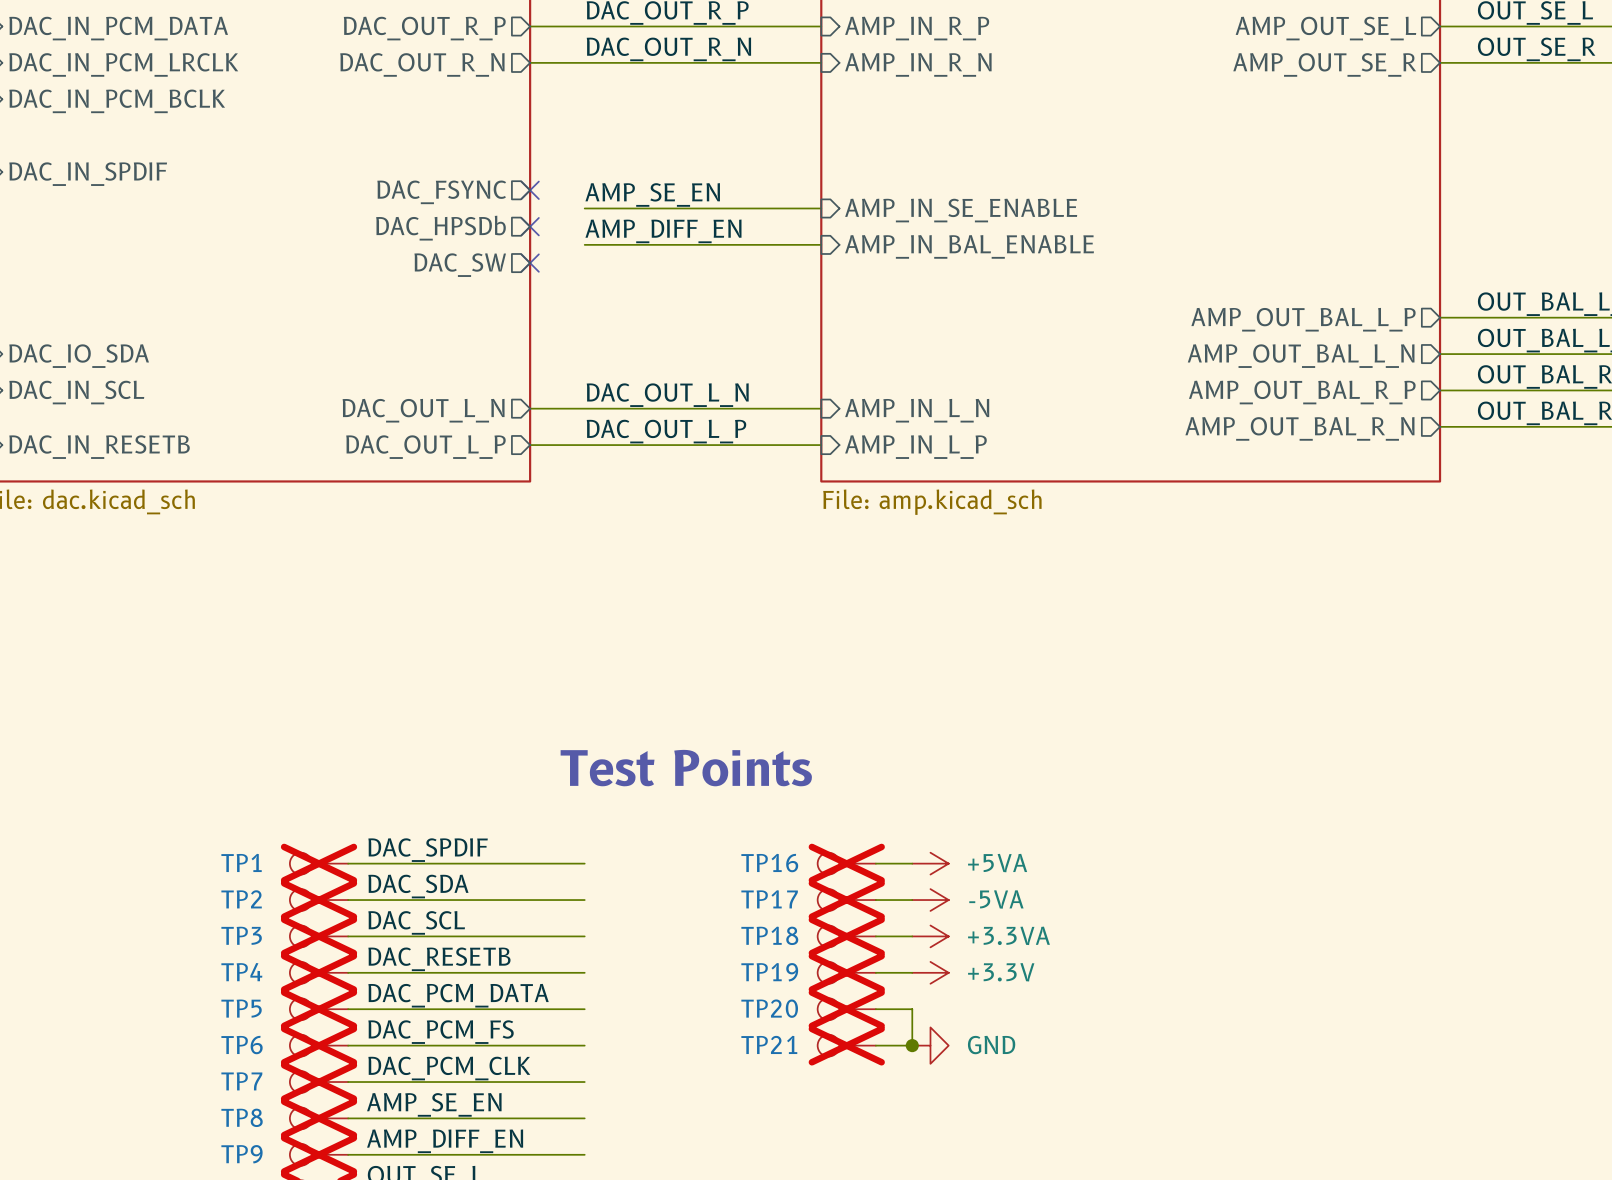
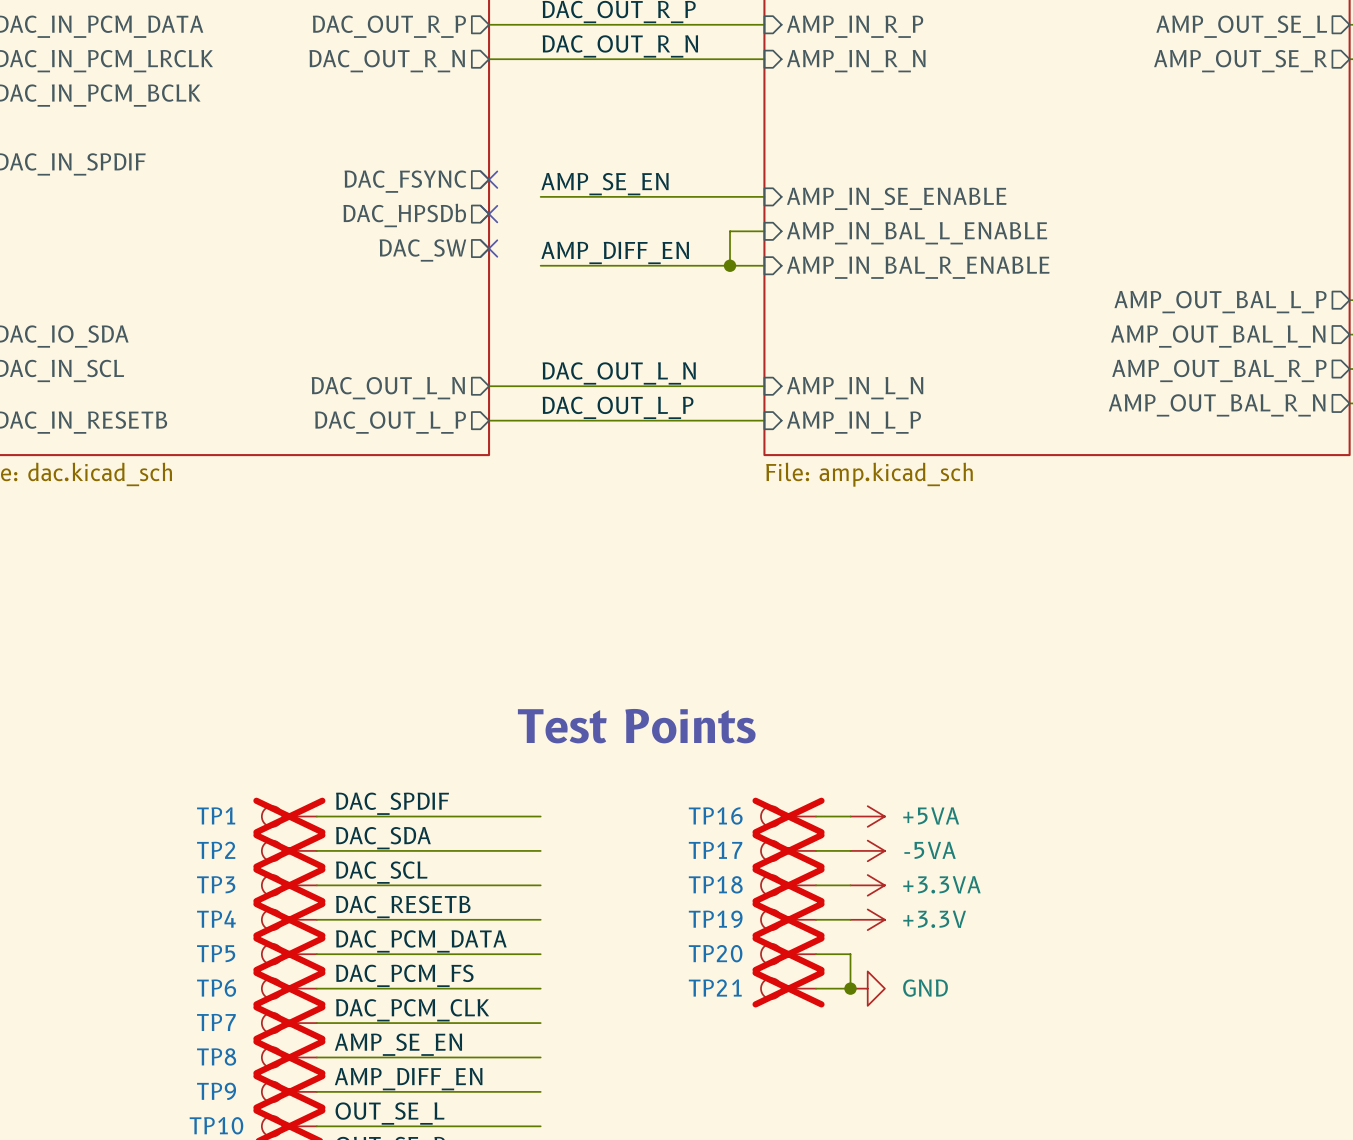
label position: AMP_DIFF_EN (663, 231) -> AMP_DIFF_EN (615, 252)
wire: (584, 244) (784, 244) -> (730, 265) (730, 231)
sheet pin: AMP_IN_BAL_ENABLE (969, 246) -> AMP_IN_BAL_L_ENABLE (917, 233)
wire: none -> (540, 265) (764, 265)
junction: none -> (730, 265)
sheet pin: none -> AMP_IN_BAL_R_ENABLE (918, 267)

